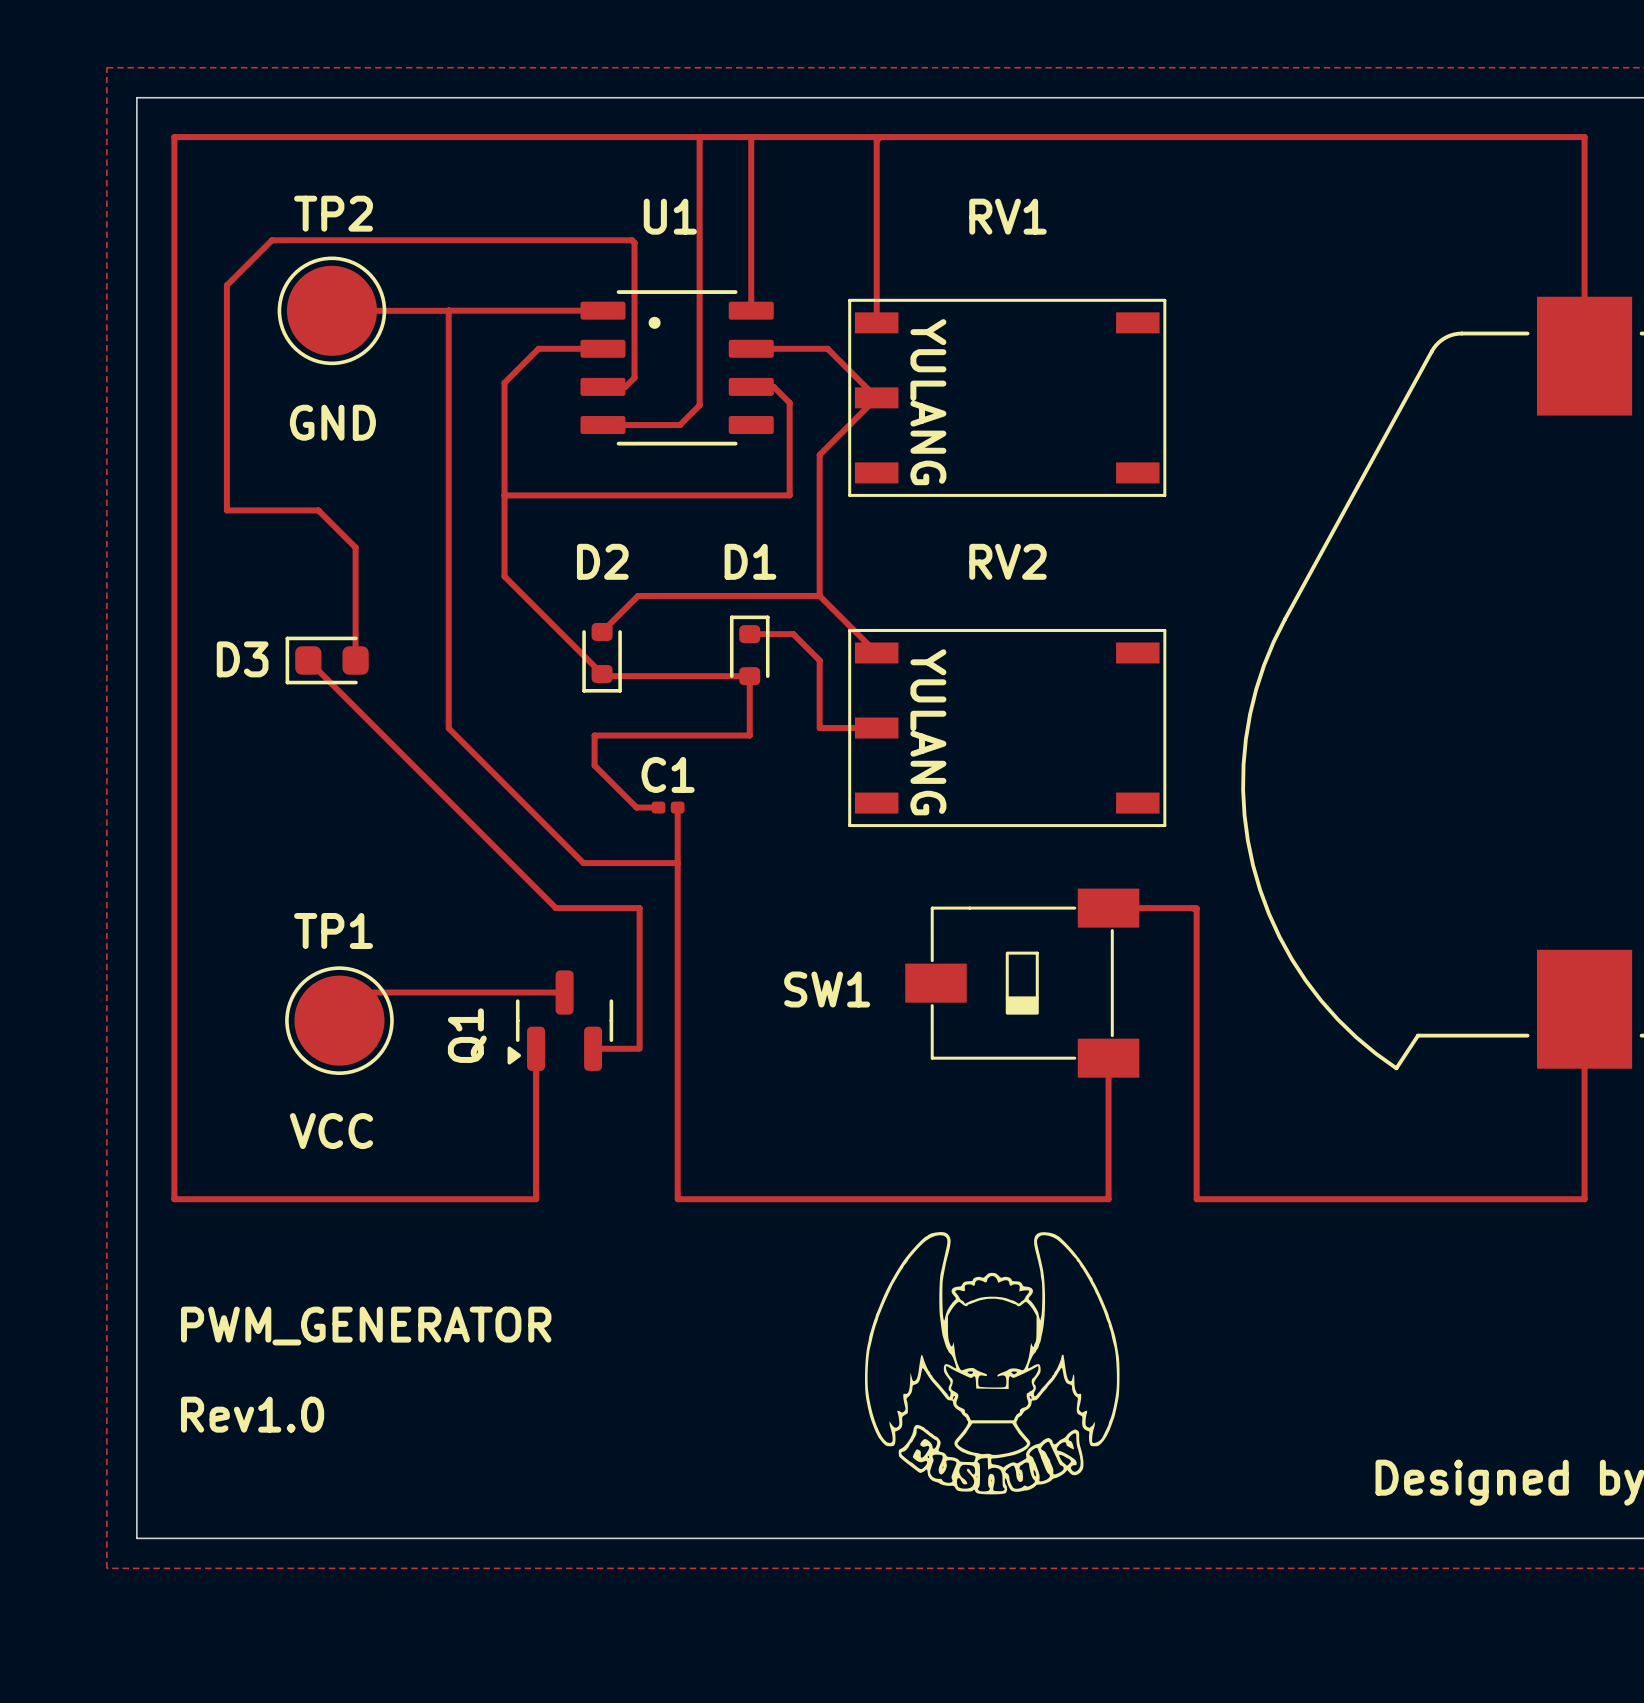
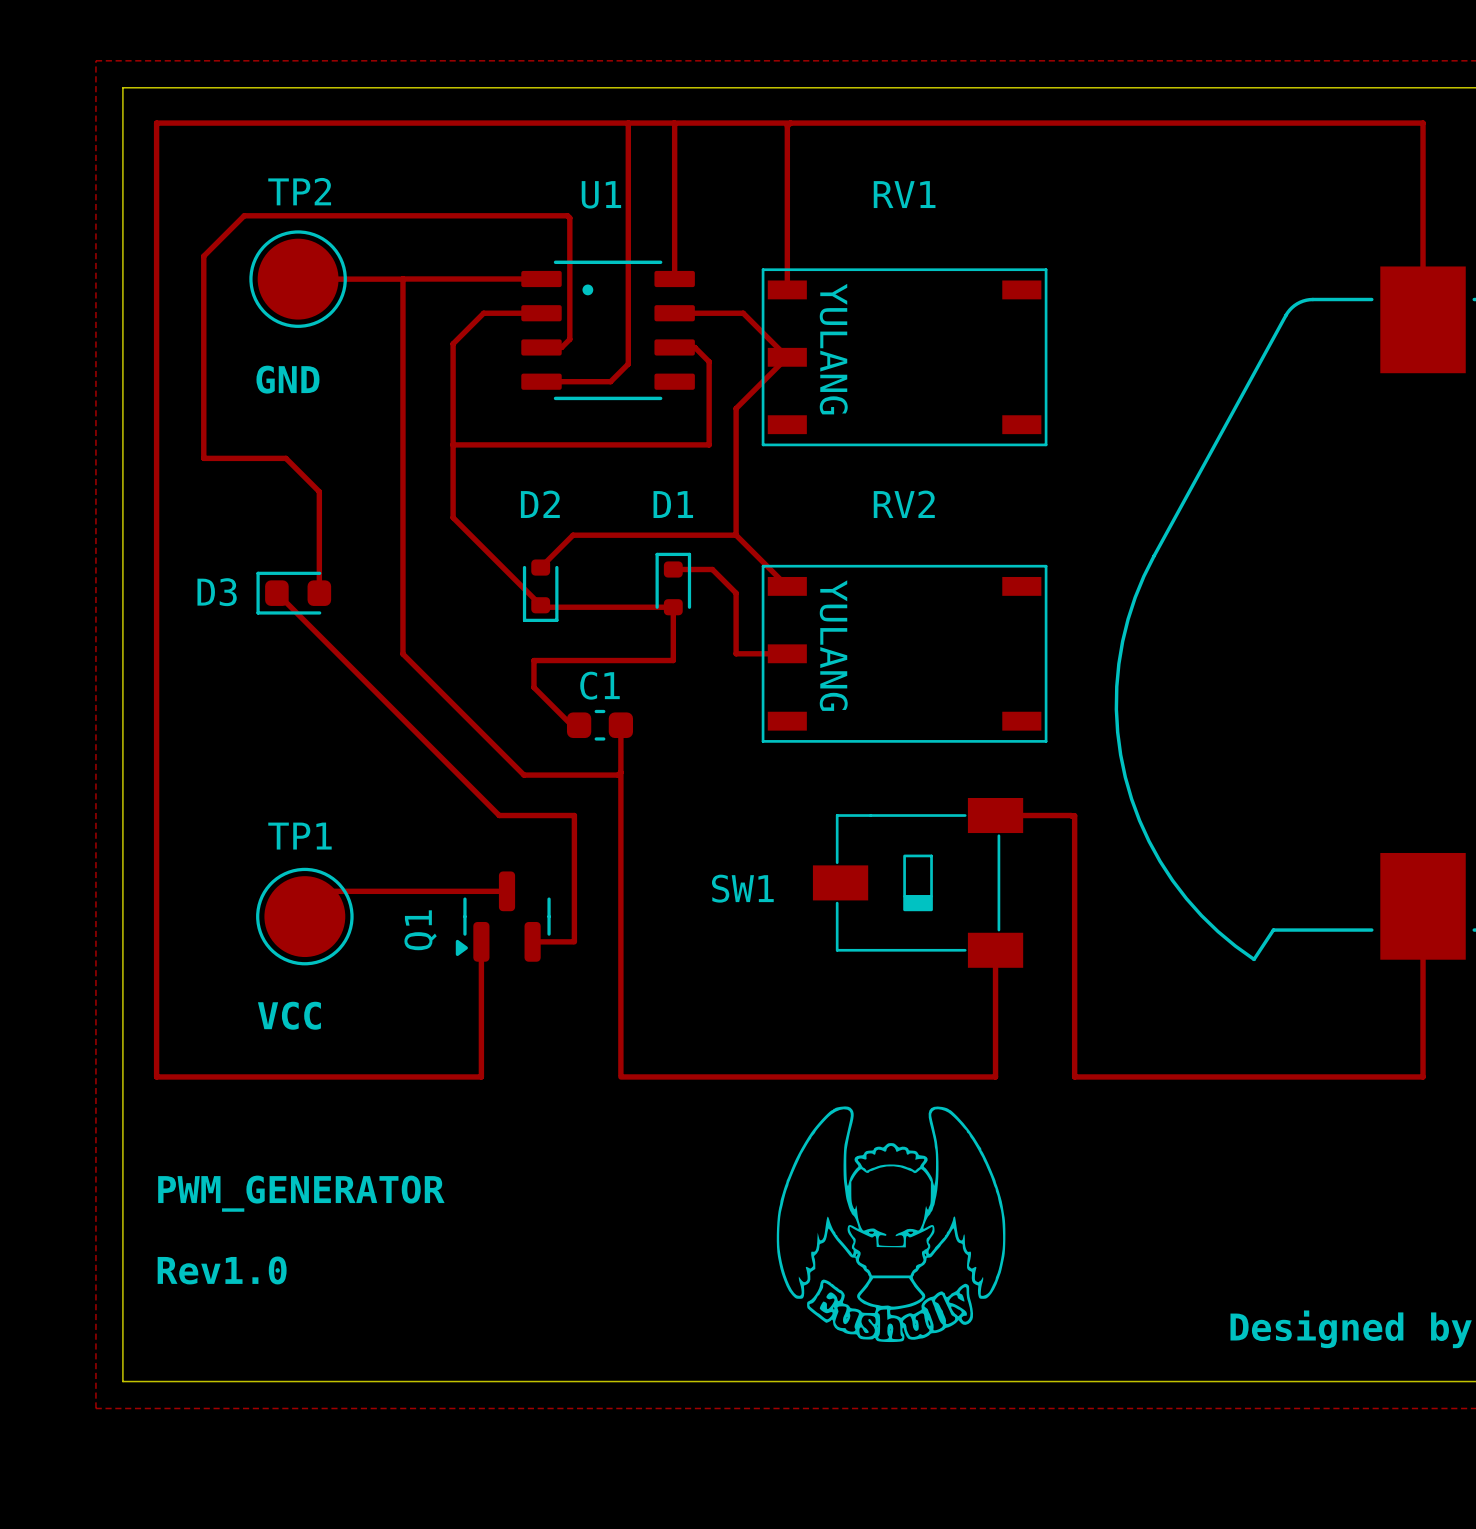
C1 footprint: [651, 801, 685, 814] -> [566, 709, 634, 741]
top track: (636, 807) (658, 807) -> none
top track: (677, 807) (677, 1199) (691, 1199) -> none
top track: none -> (620, 725) (620, 1074)
top track: none -> (620, 772) (618, 775) (608, 775)

